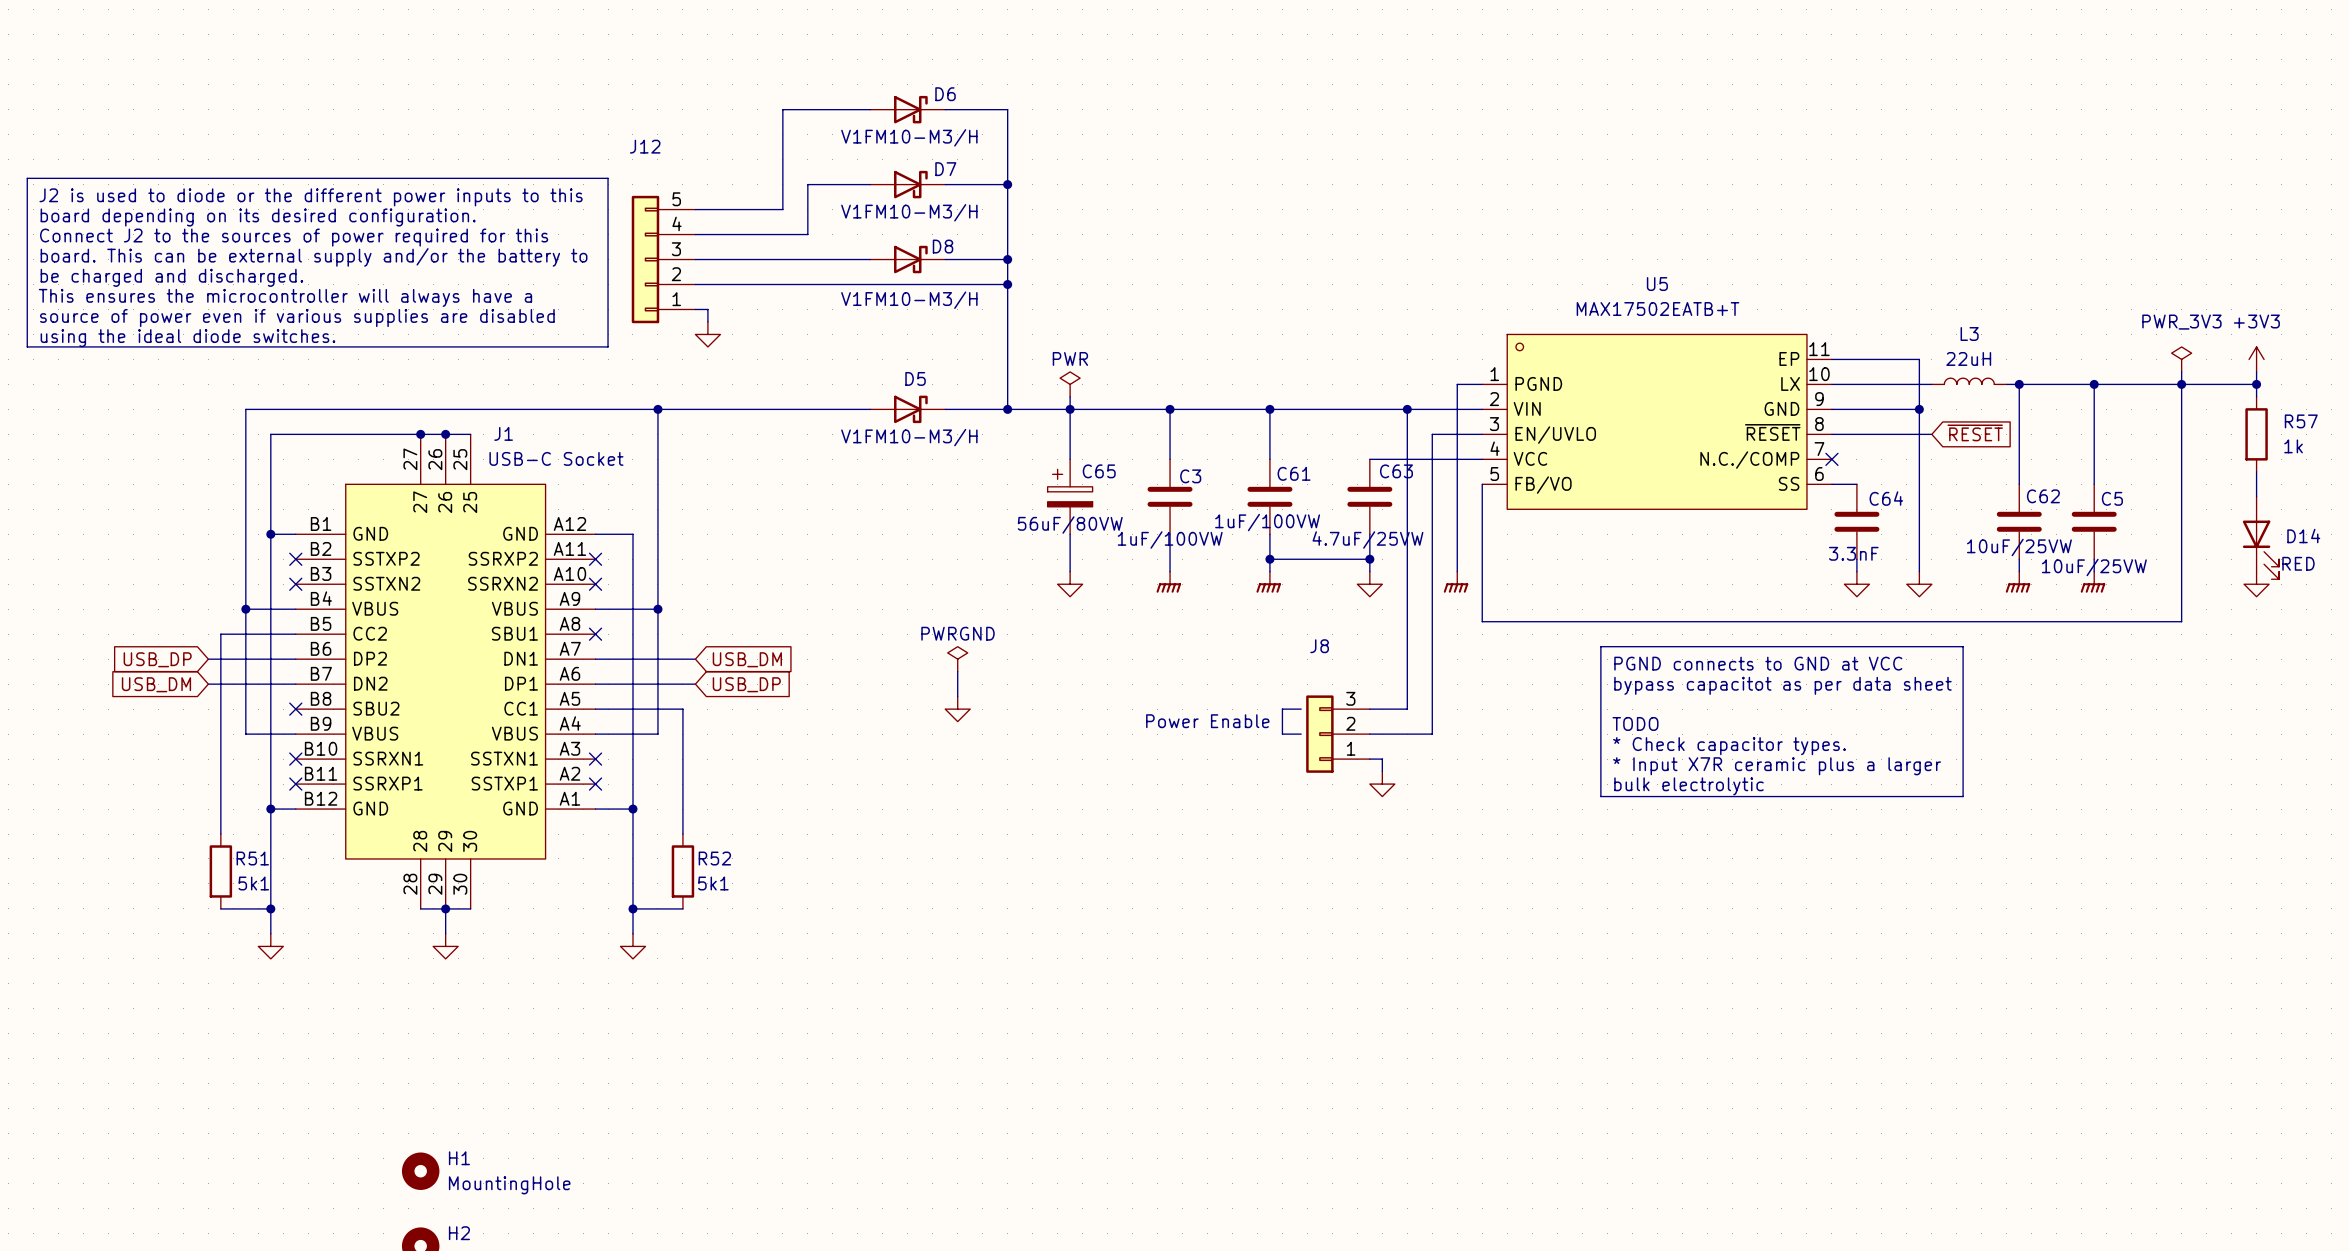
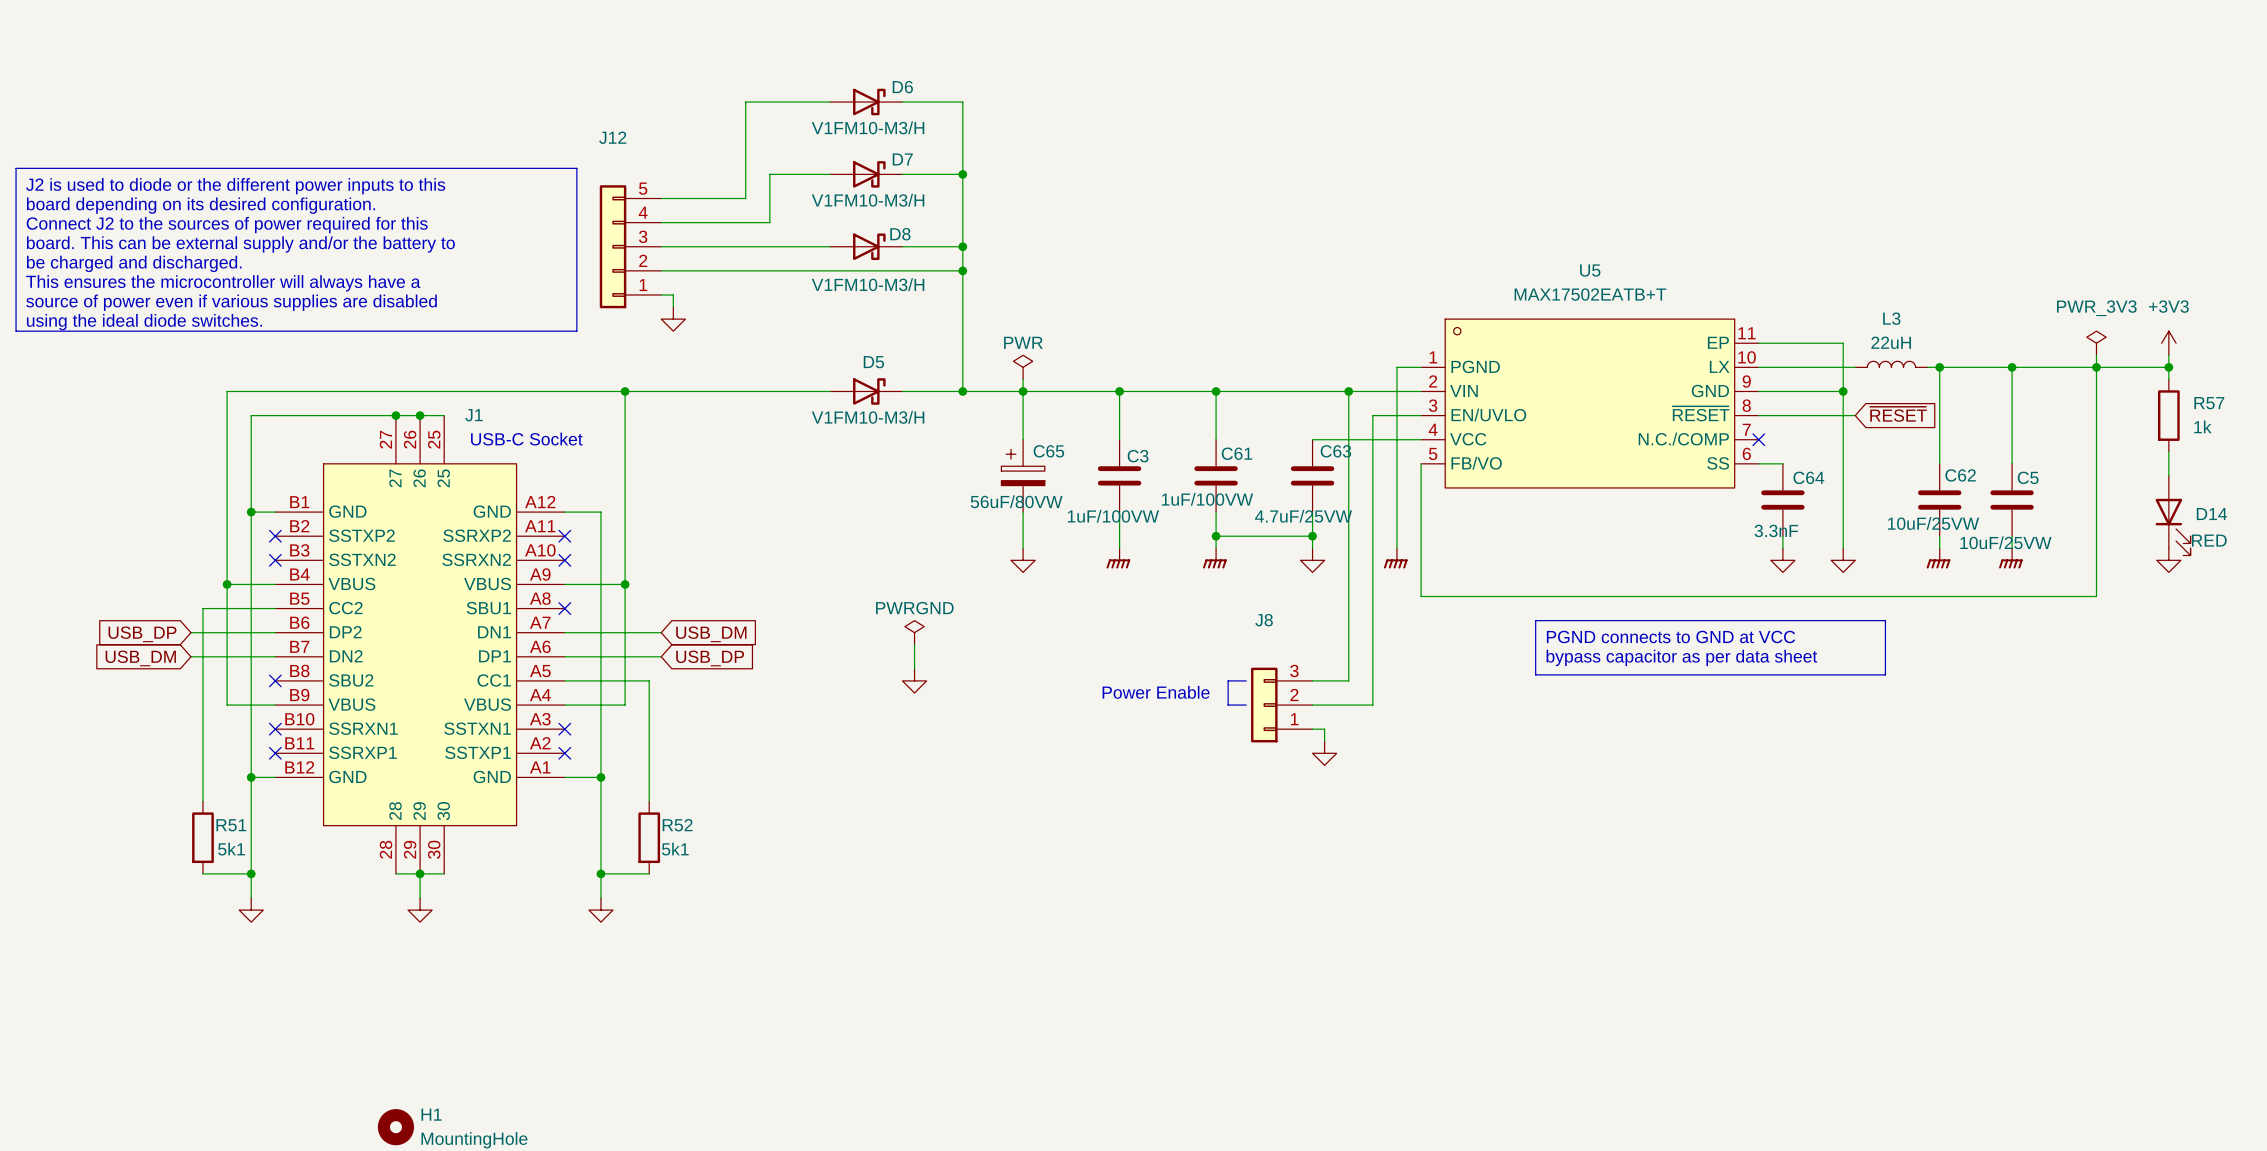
text: bypass capacitot as per data sheet (1782, 685) -> bypass capacitor as per data sheet (1681, 657)
line: (1600, 702) (1600, 796) (1963, 796) (1963, 702) -> (1535, 674) (1885, 674)
text: TODO (1635, 723) -> none
text: * Check capacitor types. (1729, 746) -> none
text: * Input X7R ceramic plus a larger (1777, 766) -> none
text: bulk electrolytic (1689, 786) -> none

